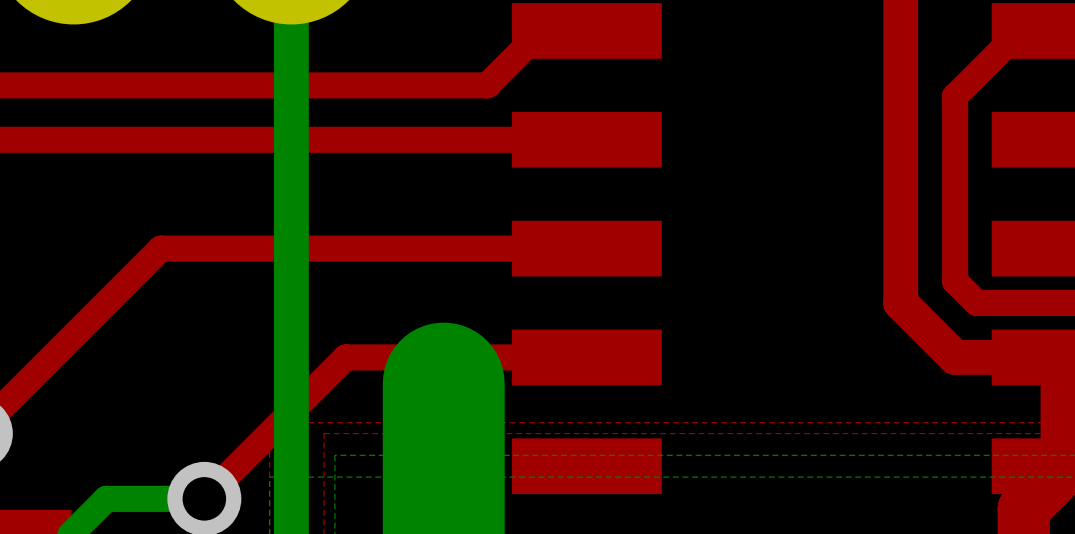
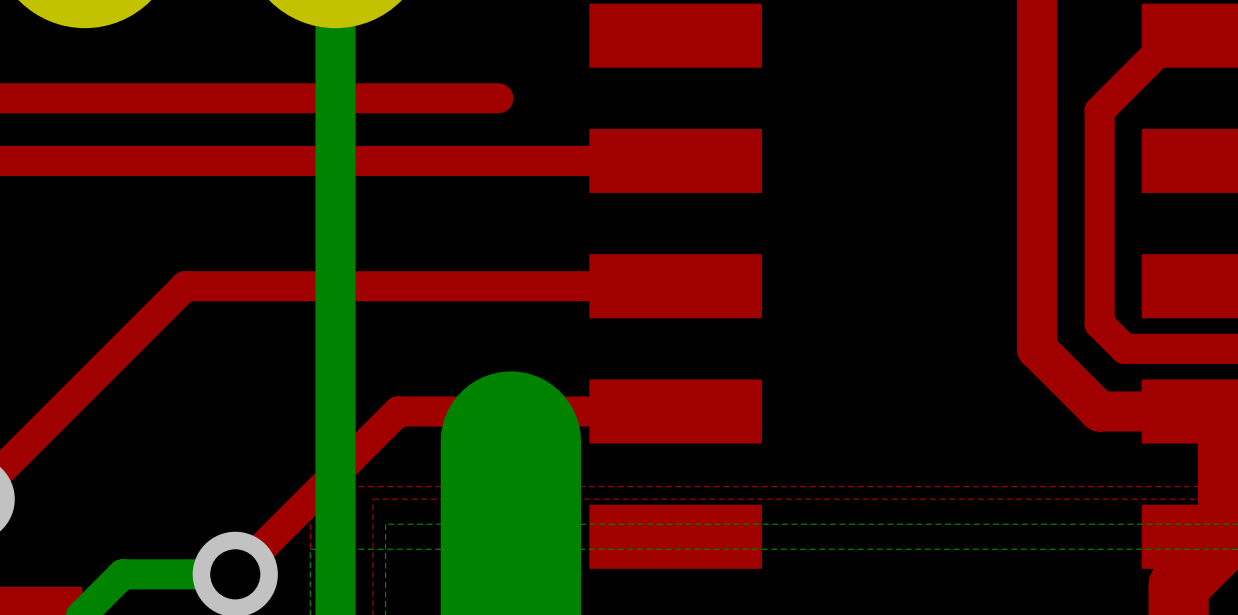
top track: (586, 30) (541, 30) (487, 85) (432, 85) -> none

